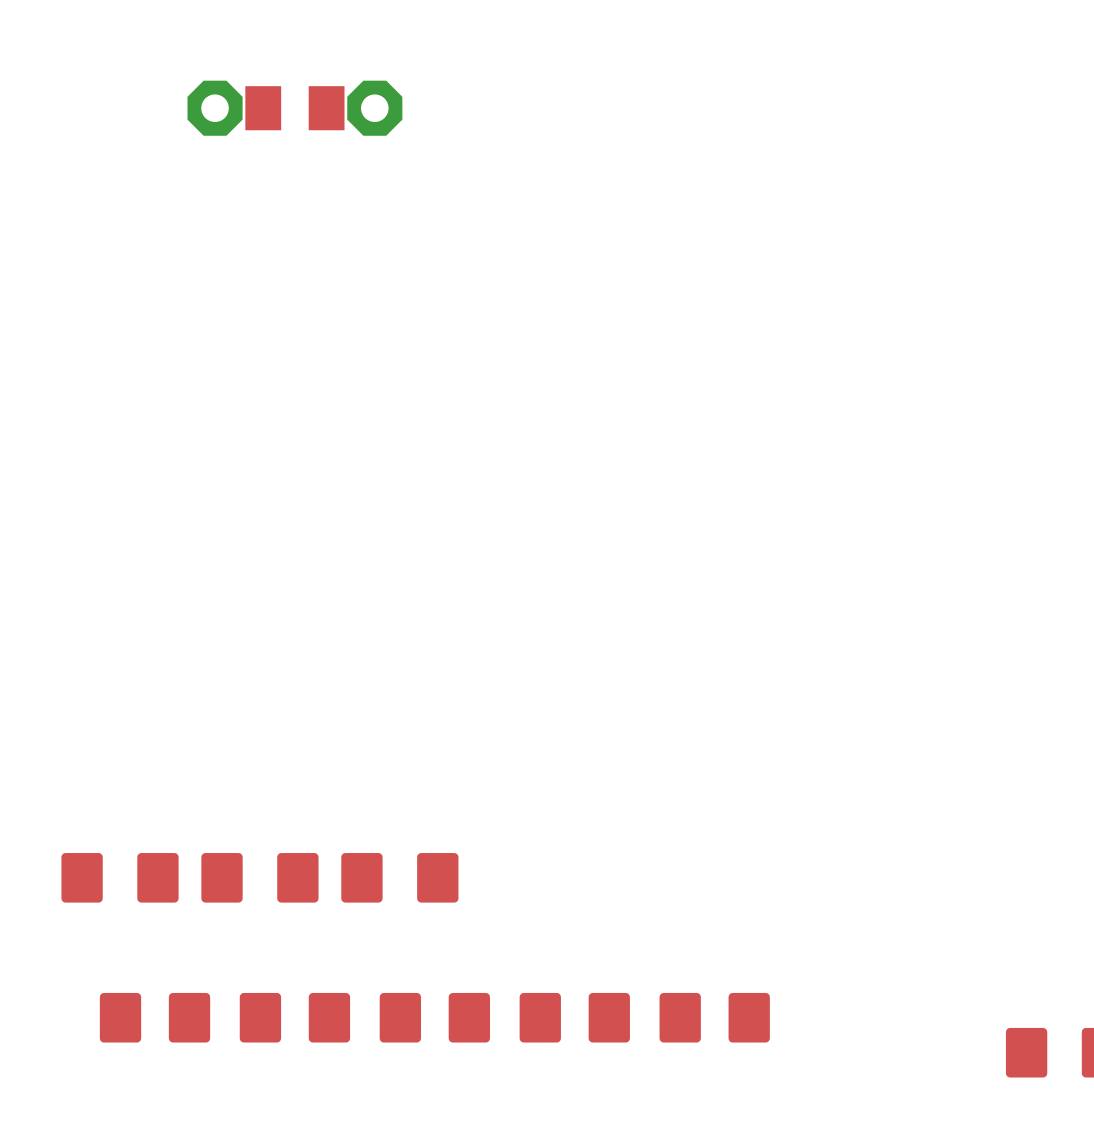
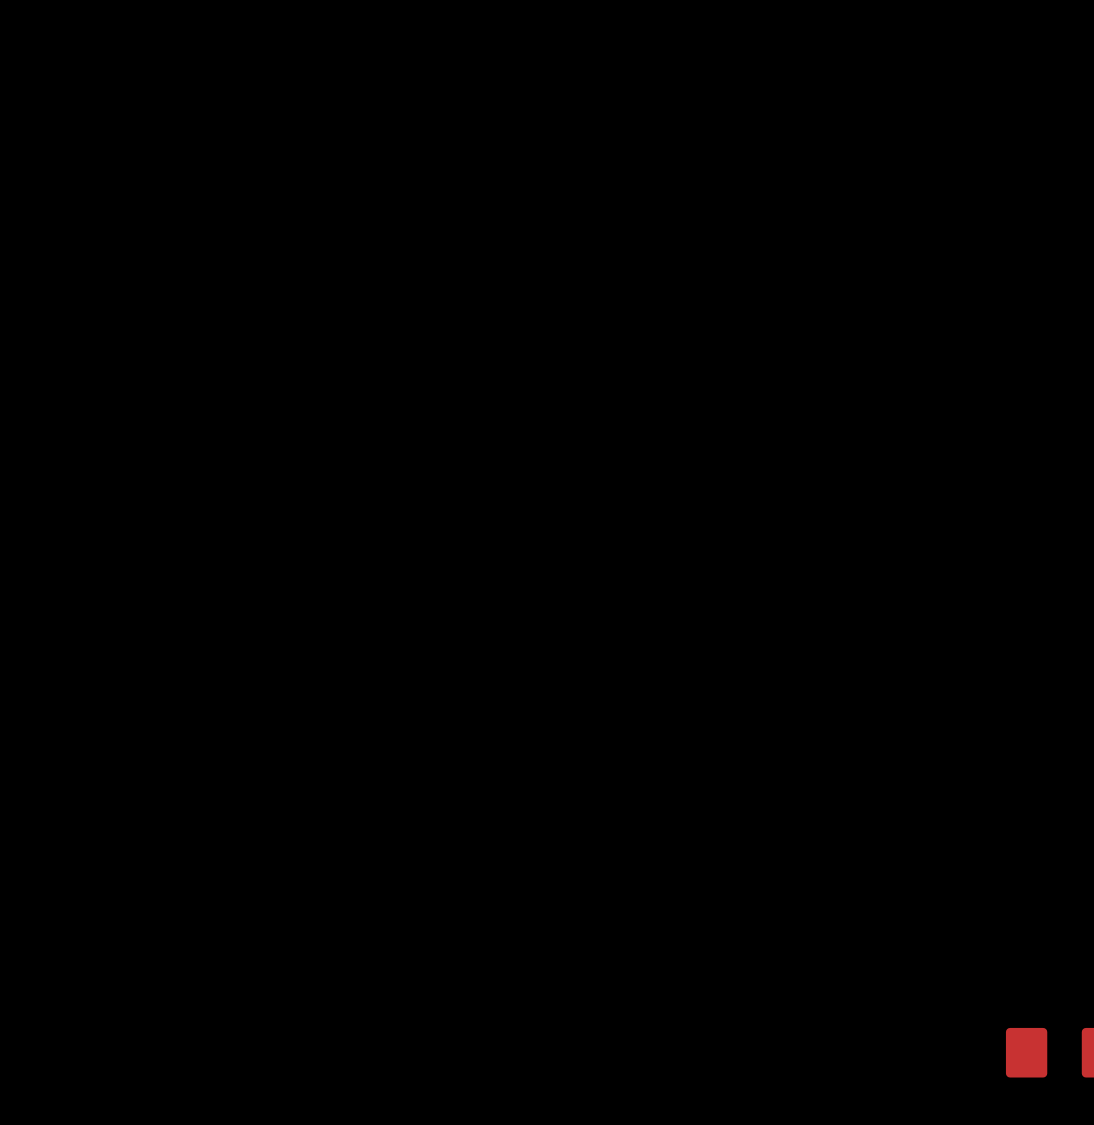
part: (294, 108) -> none
part: (120, 877) -> none
part: (259, 877) -> none
part: (399, 877) -> none
part: (155, 1017) -> none
part: (294, 1017) -> none
part: (434, 1017) -> none
part: (574, 1017) -> none
part: (714, 1017) -> none

